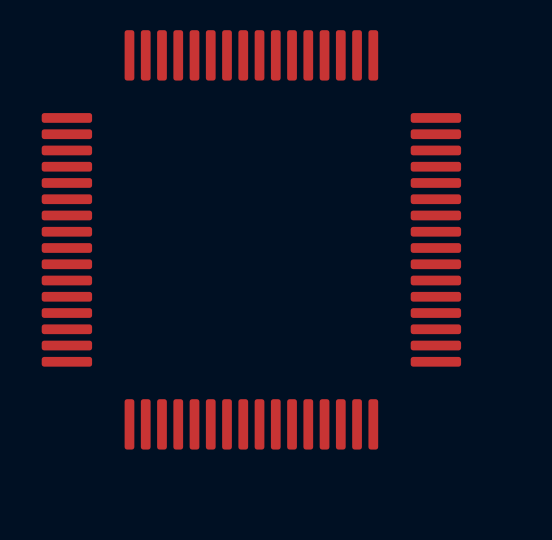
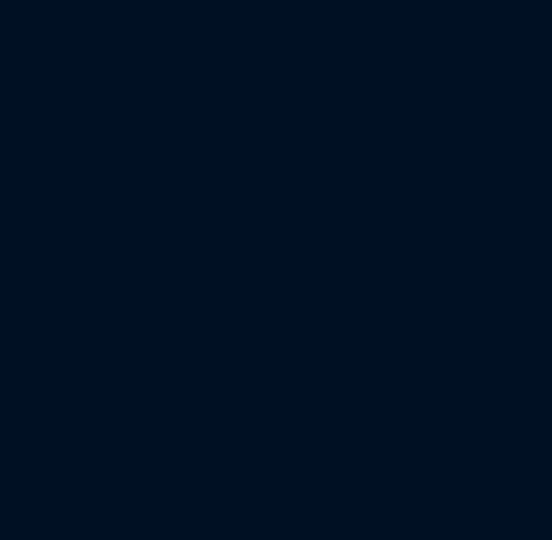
part: (251, 239) -> none

